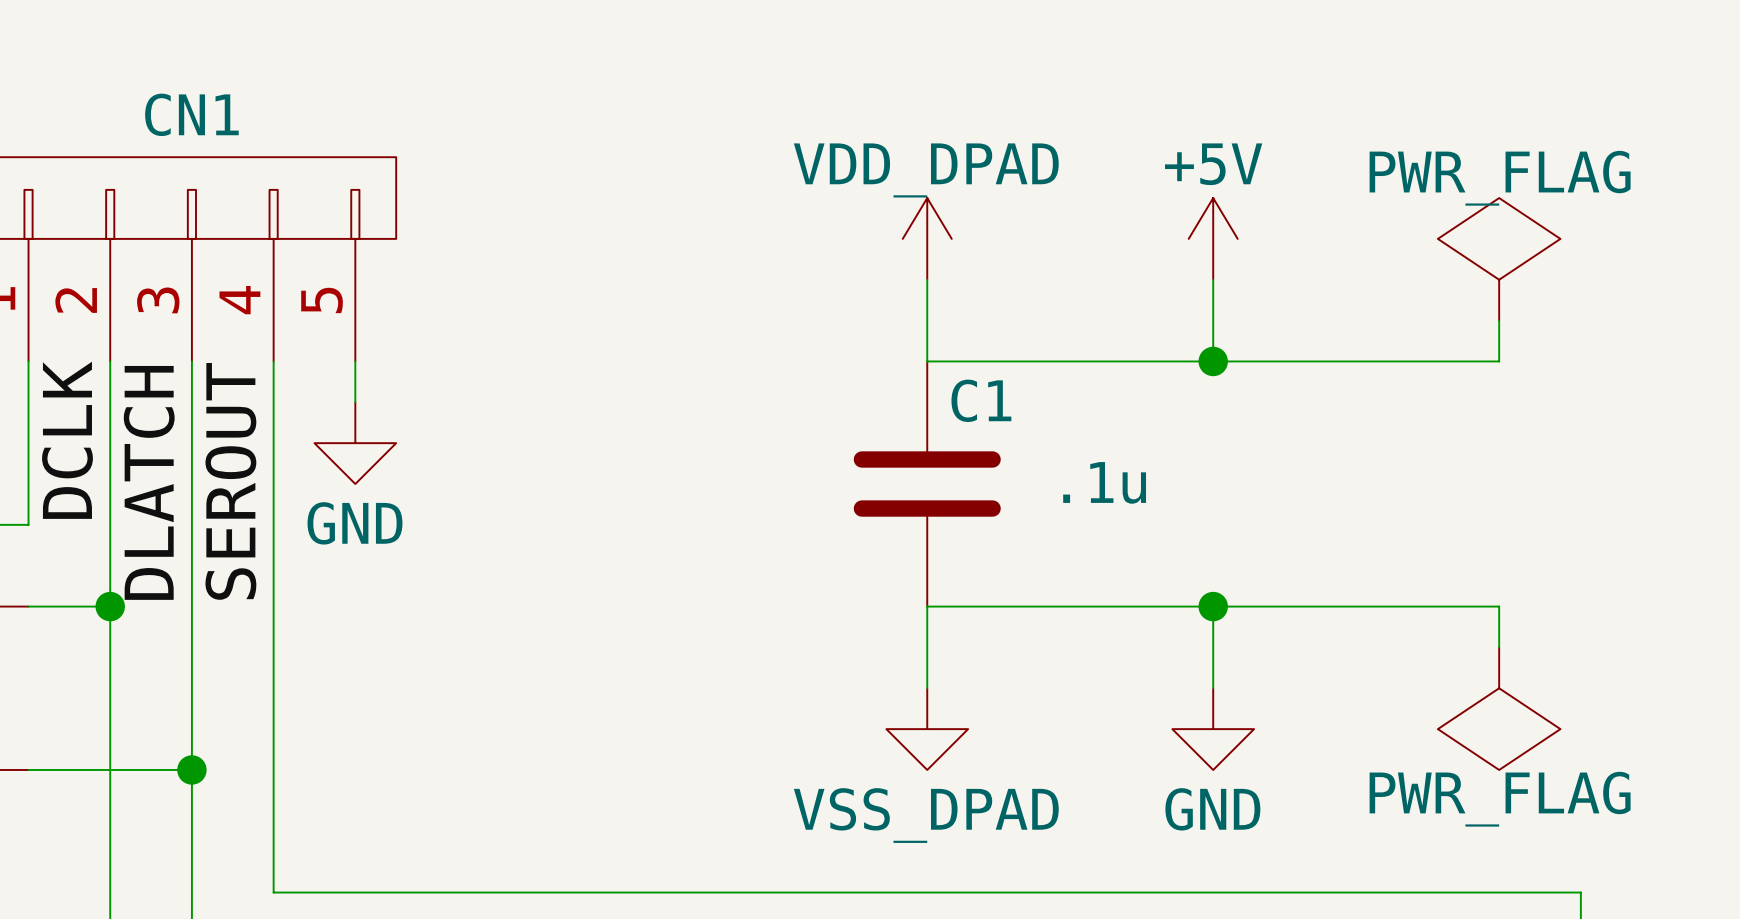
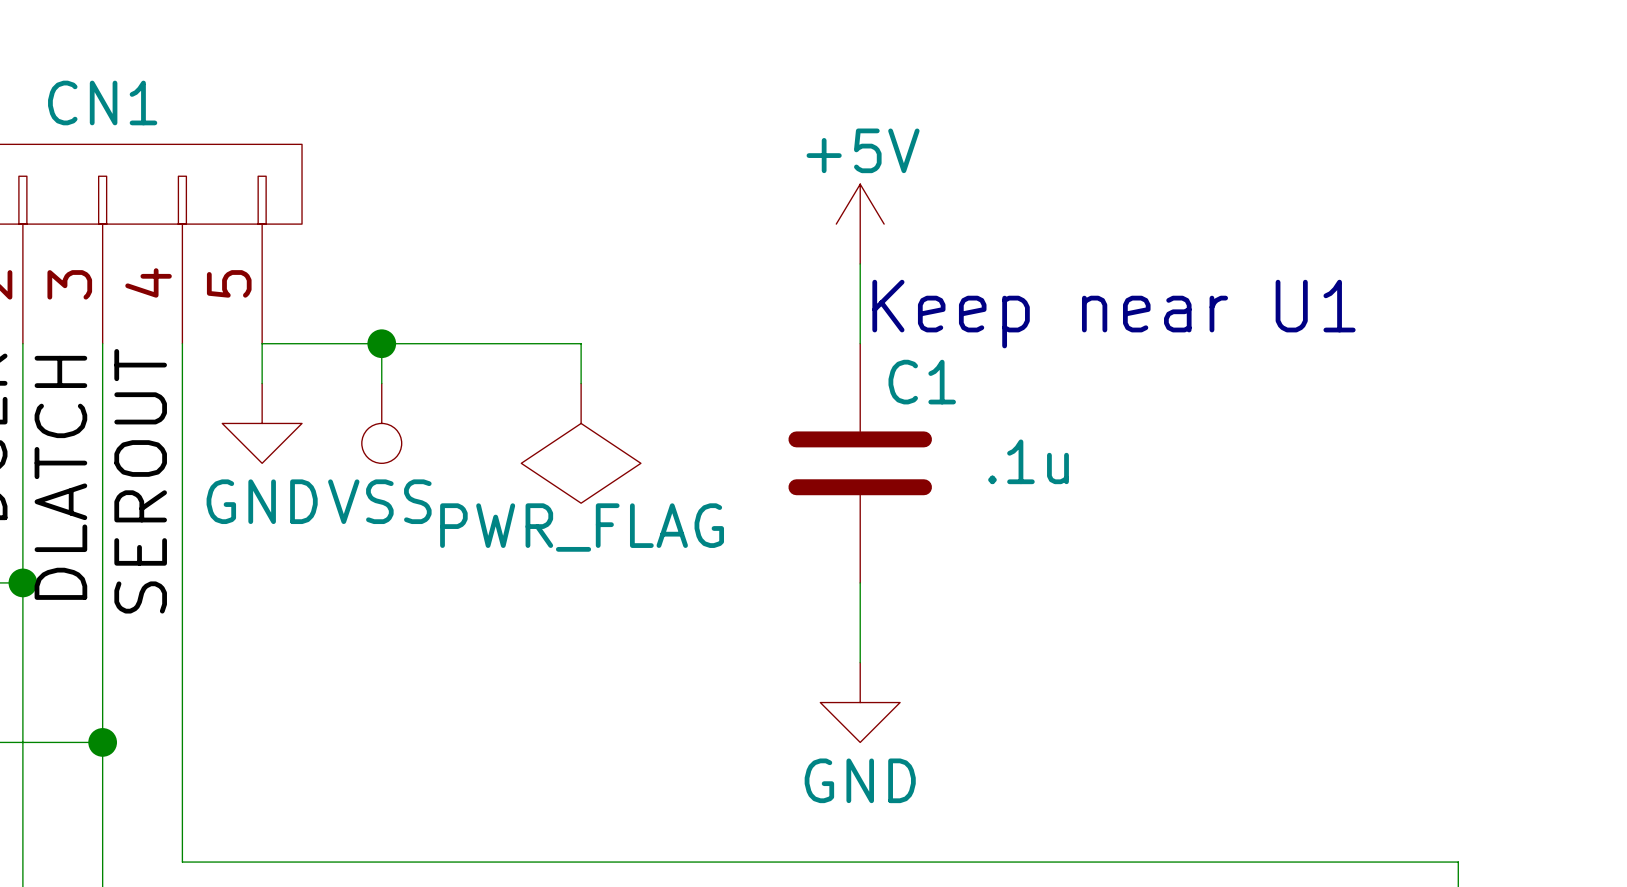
power symbol: VDD_DPAD (927, 238) -> none
power symbol position: +5V (1213, 238) -> +5V (860, 224)
power symbol: PWR_FLAG (1499, 259) -> none
wire: (927, 279) (927, 361) (1499, 361) (1499, 320) -> none
wire: (1213, 279) (1213, 361) -> (860, 263) (860, 343)
text: none -> Keep near U1 (1113, 314)
wire: none -> (262, 343) (581, 343) (581, 383)
wire: none -> (381, 343) (381, 383)
junction: none -> (381, 343)
junction: (1213, 361) -> none
power symbol: none -> VSS (381, 423)
power symbol: none -> PWR_FLAG (581, 443)
C1 position: (927, 484) -> (860, 463)
wire: (1213, 606) (1213, 688) -> (860, 582) (860, 662)
junction: (1213, 606) -> none
wire: (1499, 647) (1499, 606) (927, 606) (927, 688) -> none
power symbol: PWR_FLAG (1499, 708) -> none
power symbol: VSS_DPAD (927, 729) -> none
power symbol position: GND (1213, 729) -> GND (860, 702)

